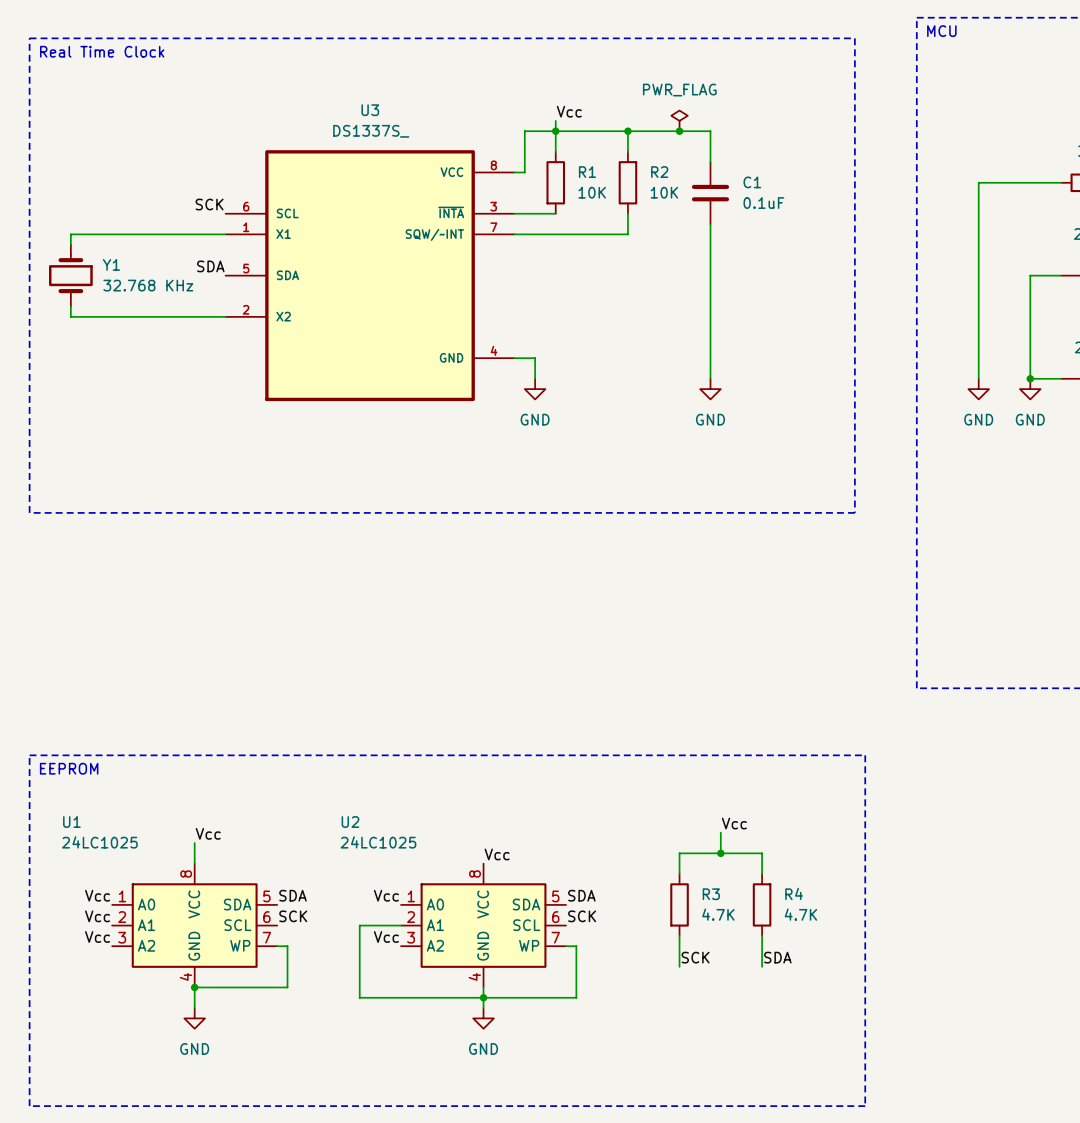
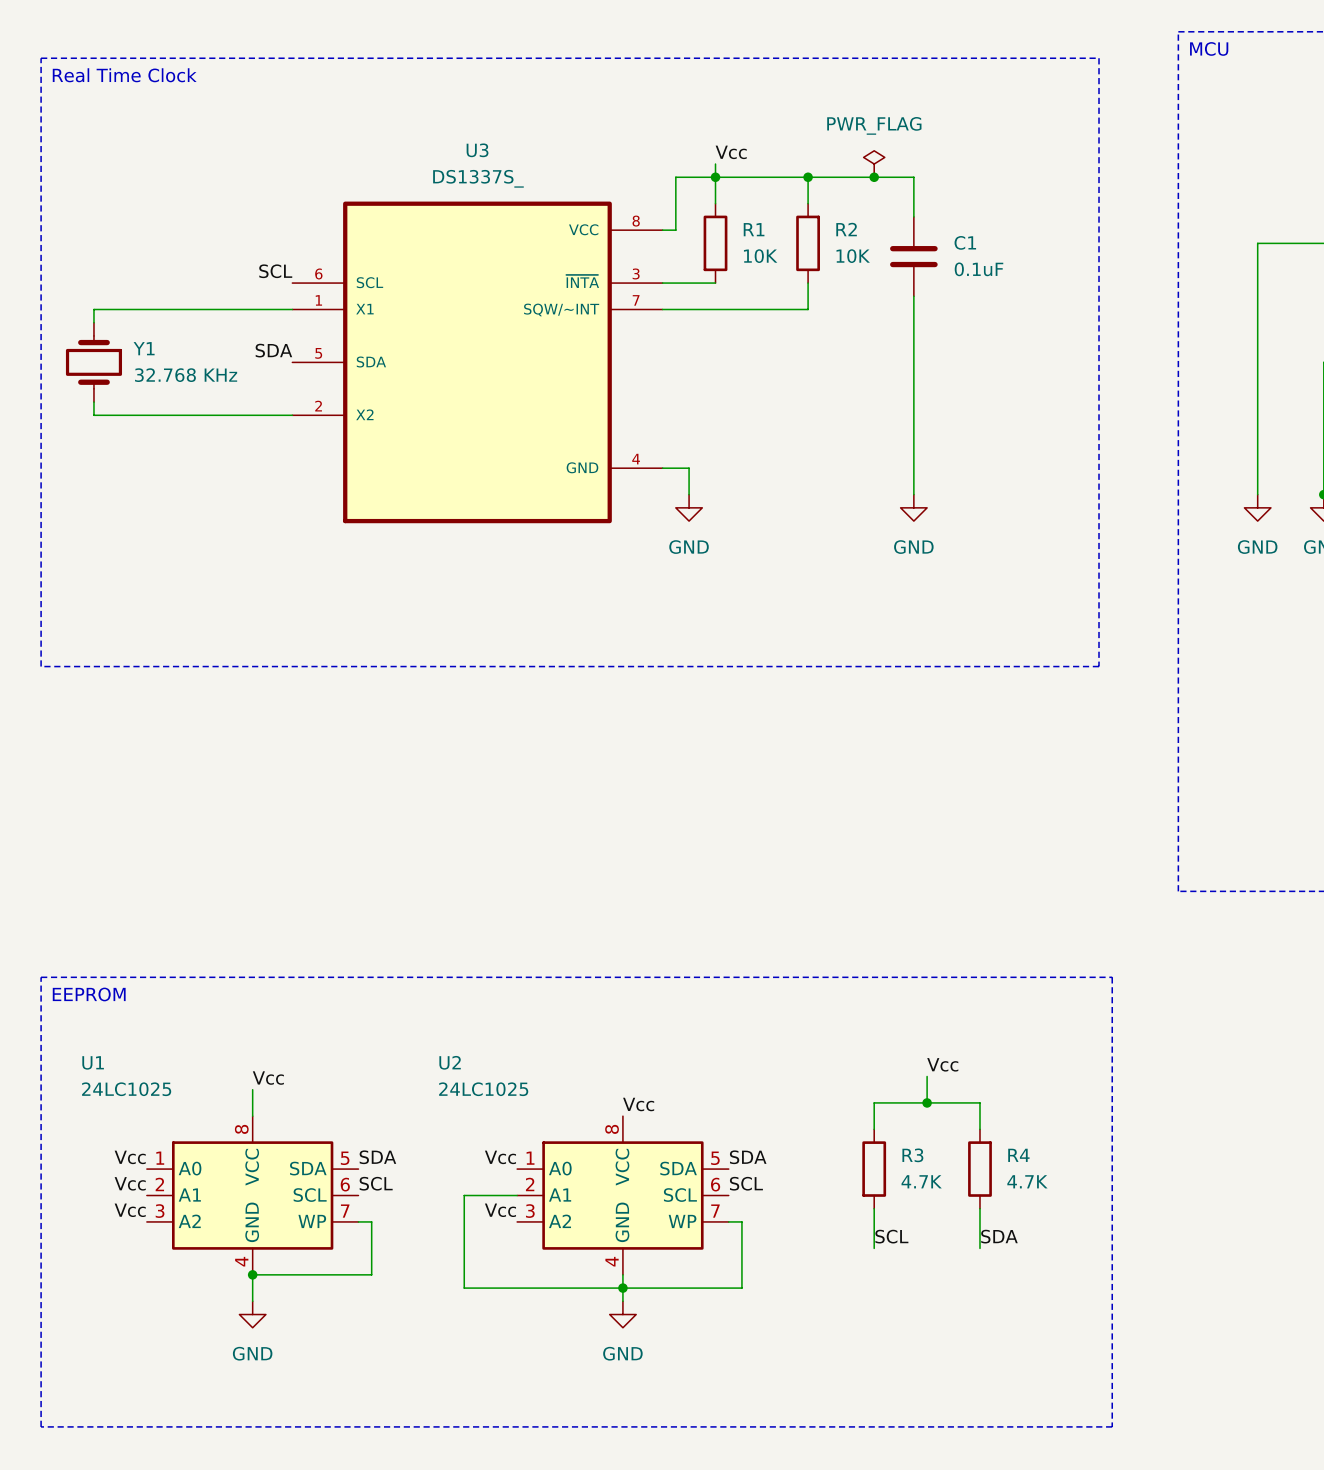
label: SCK (209, 204) -> SCL (275, 271)
label: SCK (293, 916) -> SCL (376, 1183)
label: SCK (582, 916) -> SCL (746, 1183)
label: SCK (695, 957) -> SCL (891, 1236)

